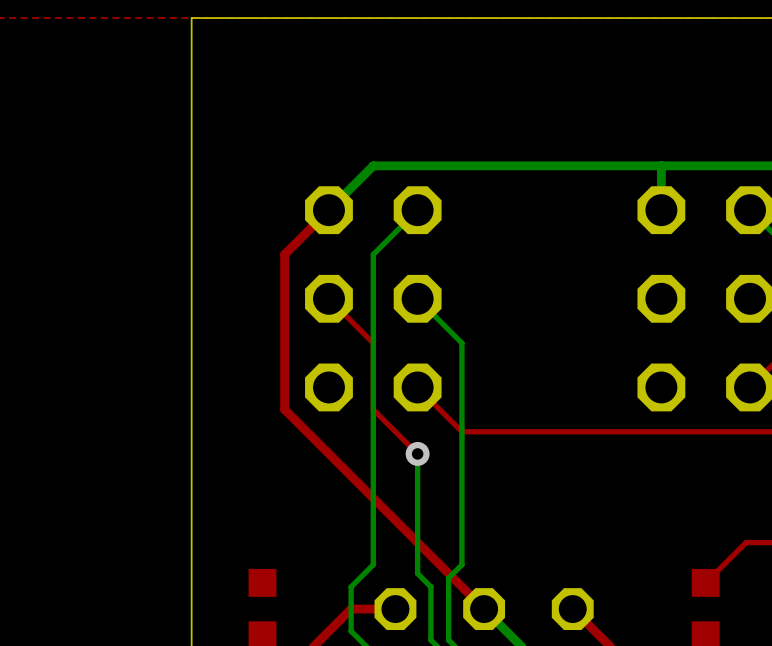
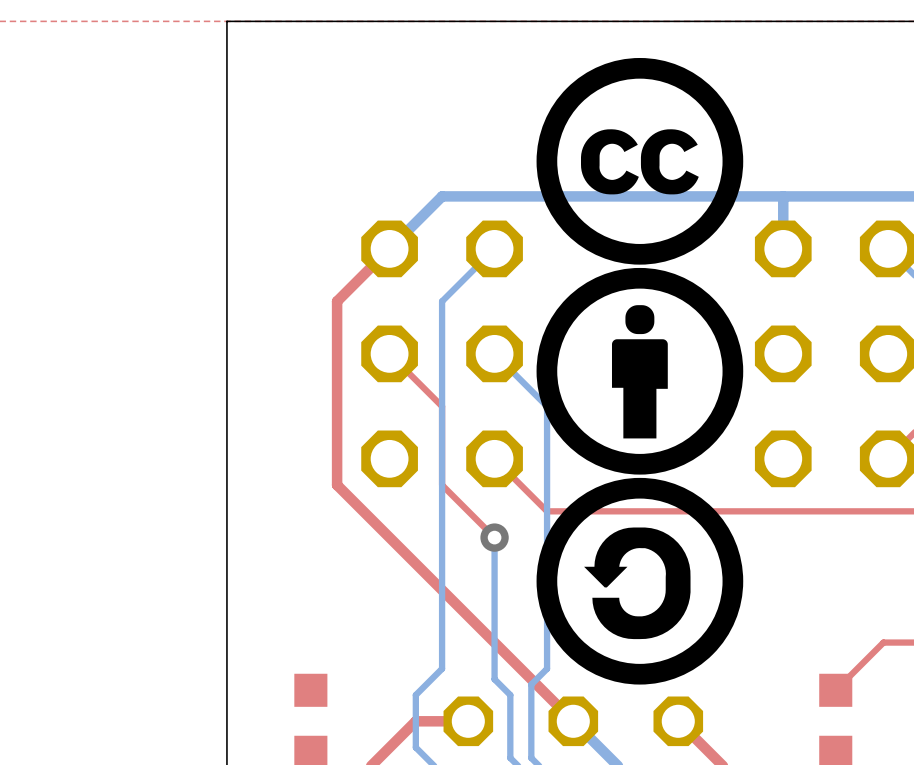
drawing: none -> [536, 57, 744, 685]

